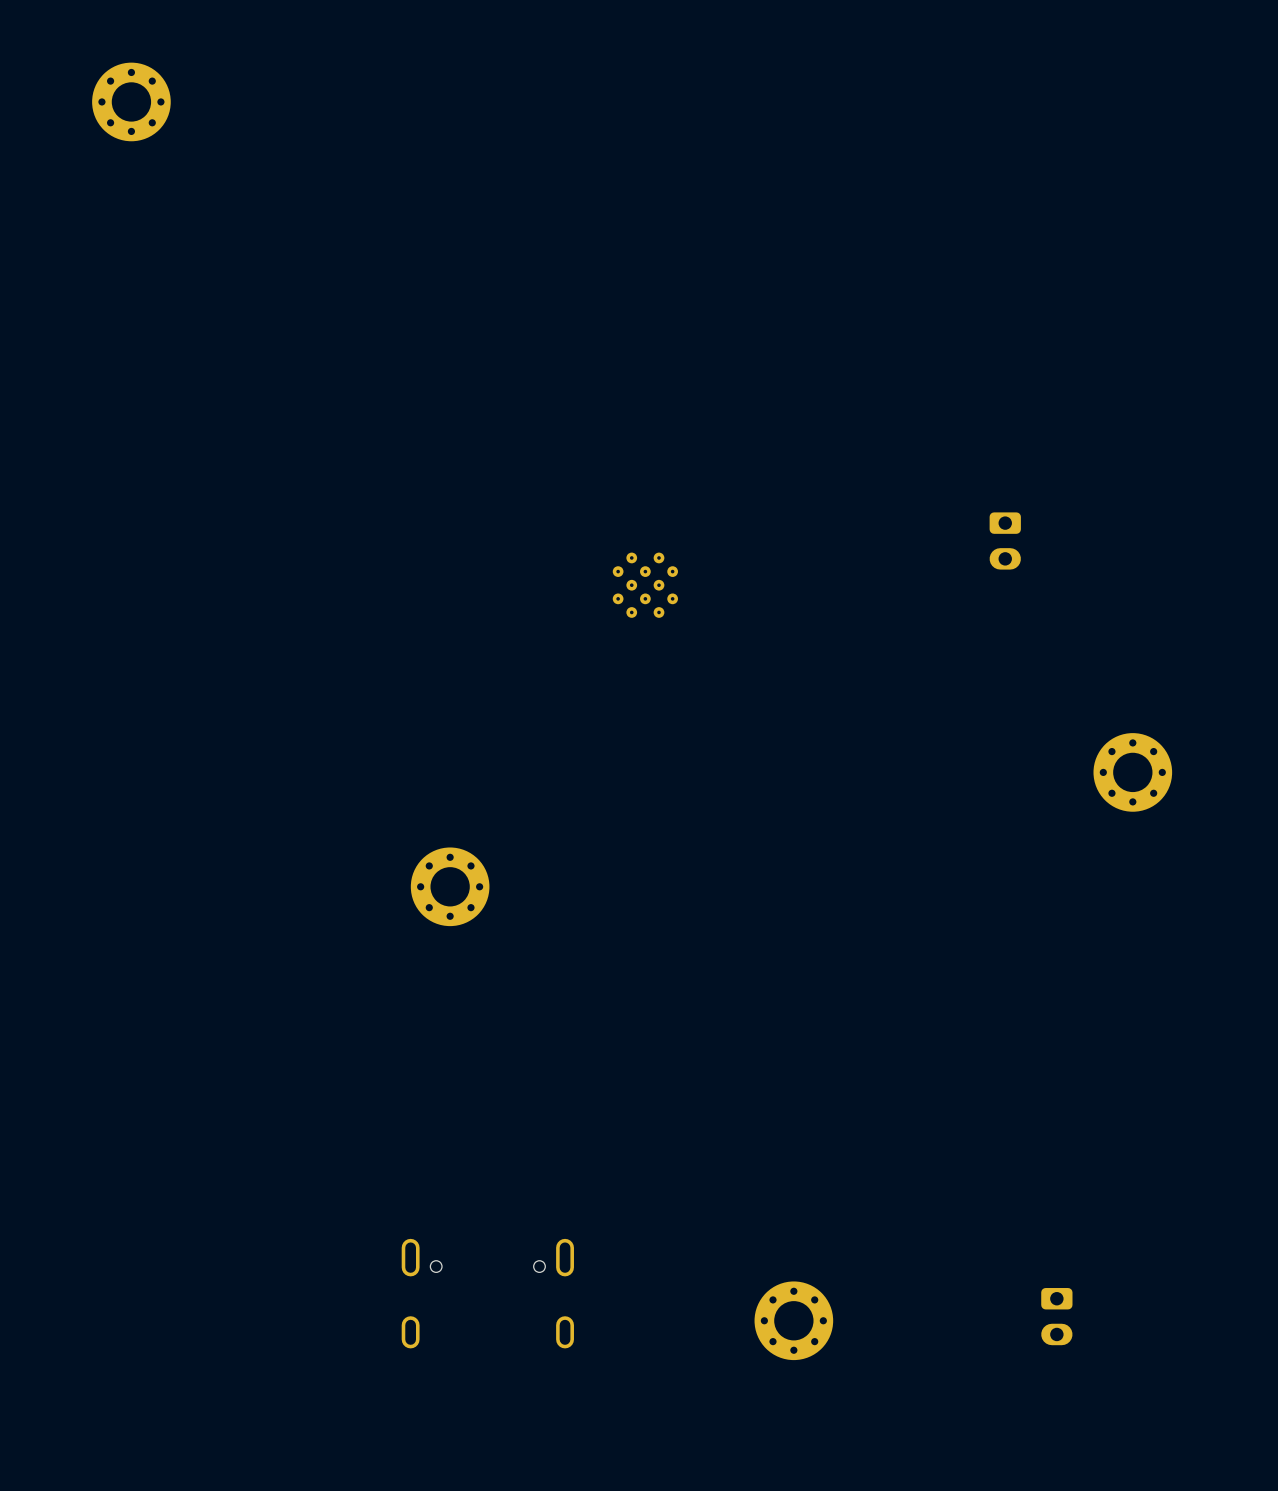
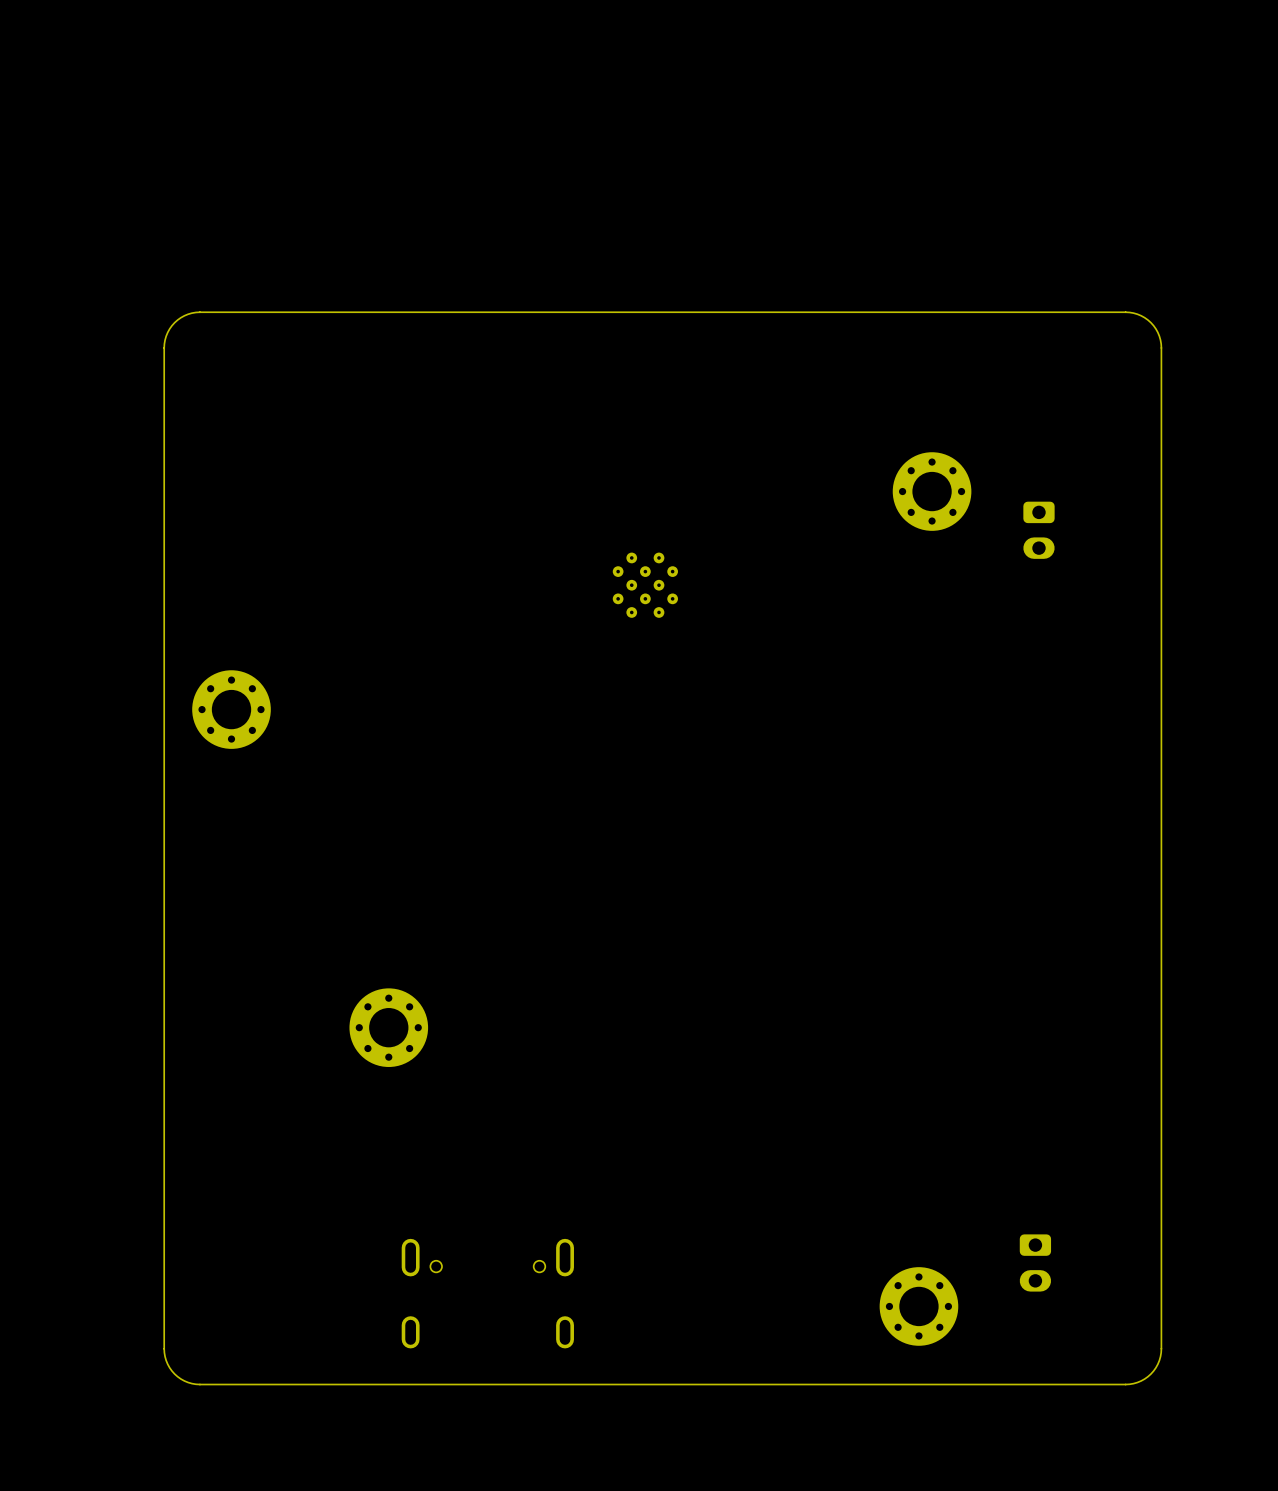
part: (131, 101) -> none
board edge: none -> (1125, 312) (199, 312) (184, 315) (171, 325) (166, 336) (164, 347) (164, 1348) (167, 1364) (177, 1376) (188, 1382) (199, 1384) (1125, 1384) (1141, 1380) (1153, 1371) (1159, 1360) (1161, 1348) (1161, 347) (1157, 332) (1150, 322) (1137, 314) (1125, 312)
part: none -> (932, 491)
part position: (1005, 540) -> (1038, 530)
part: none -> (231, 709)
part: (1132, 772) -> none
part: (450, 886) -> none
part: none -> (388, 1027)
part position: (1056, 1316) -> (1035, 1262)
part position: (793, 1320) -> (918, 1306)

